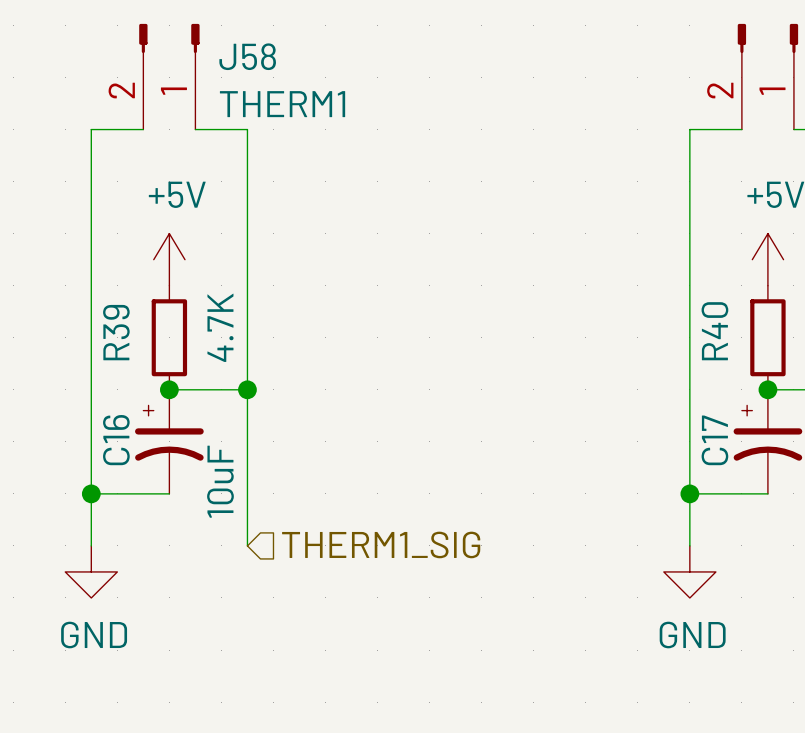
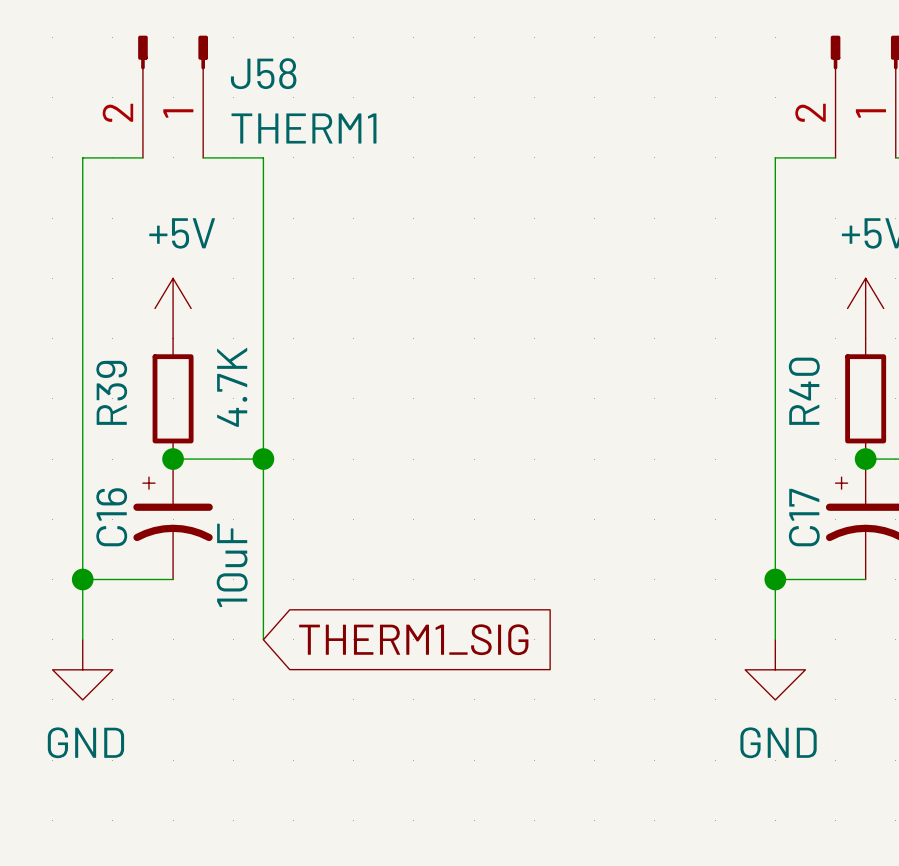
hierarchical label: THERM1_SIG (381, 544) -> none
global label: none -> THERM1_SIG (413, 639)

